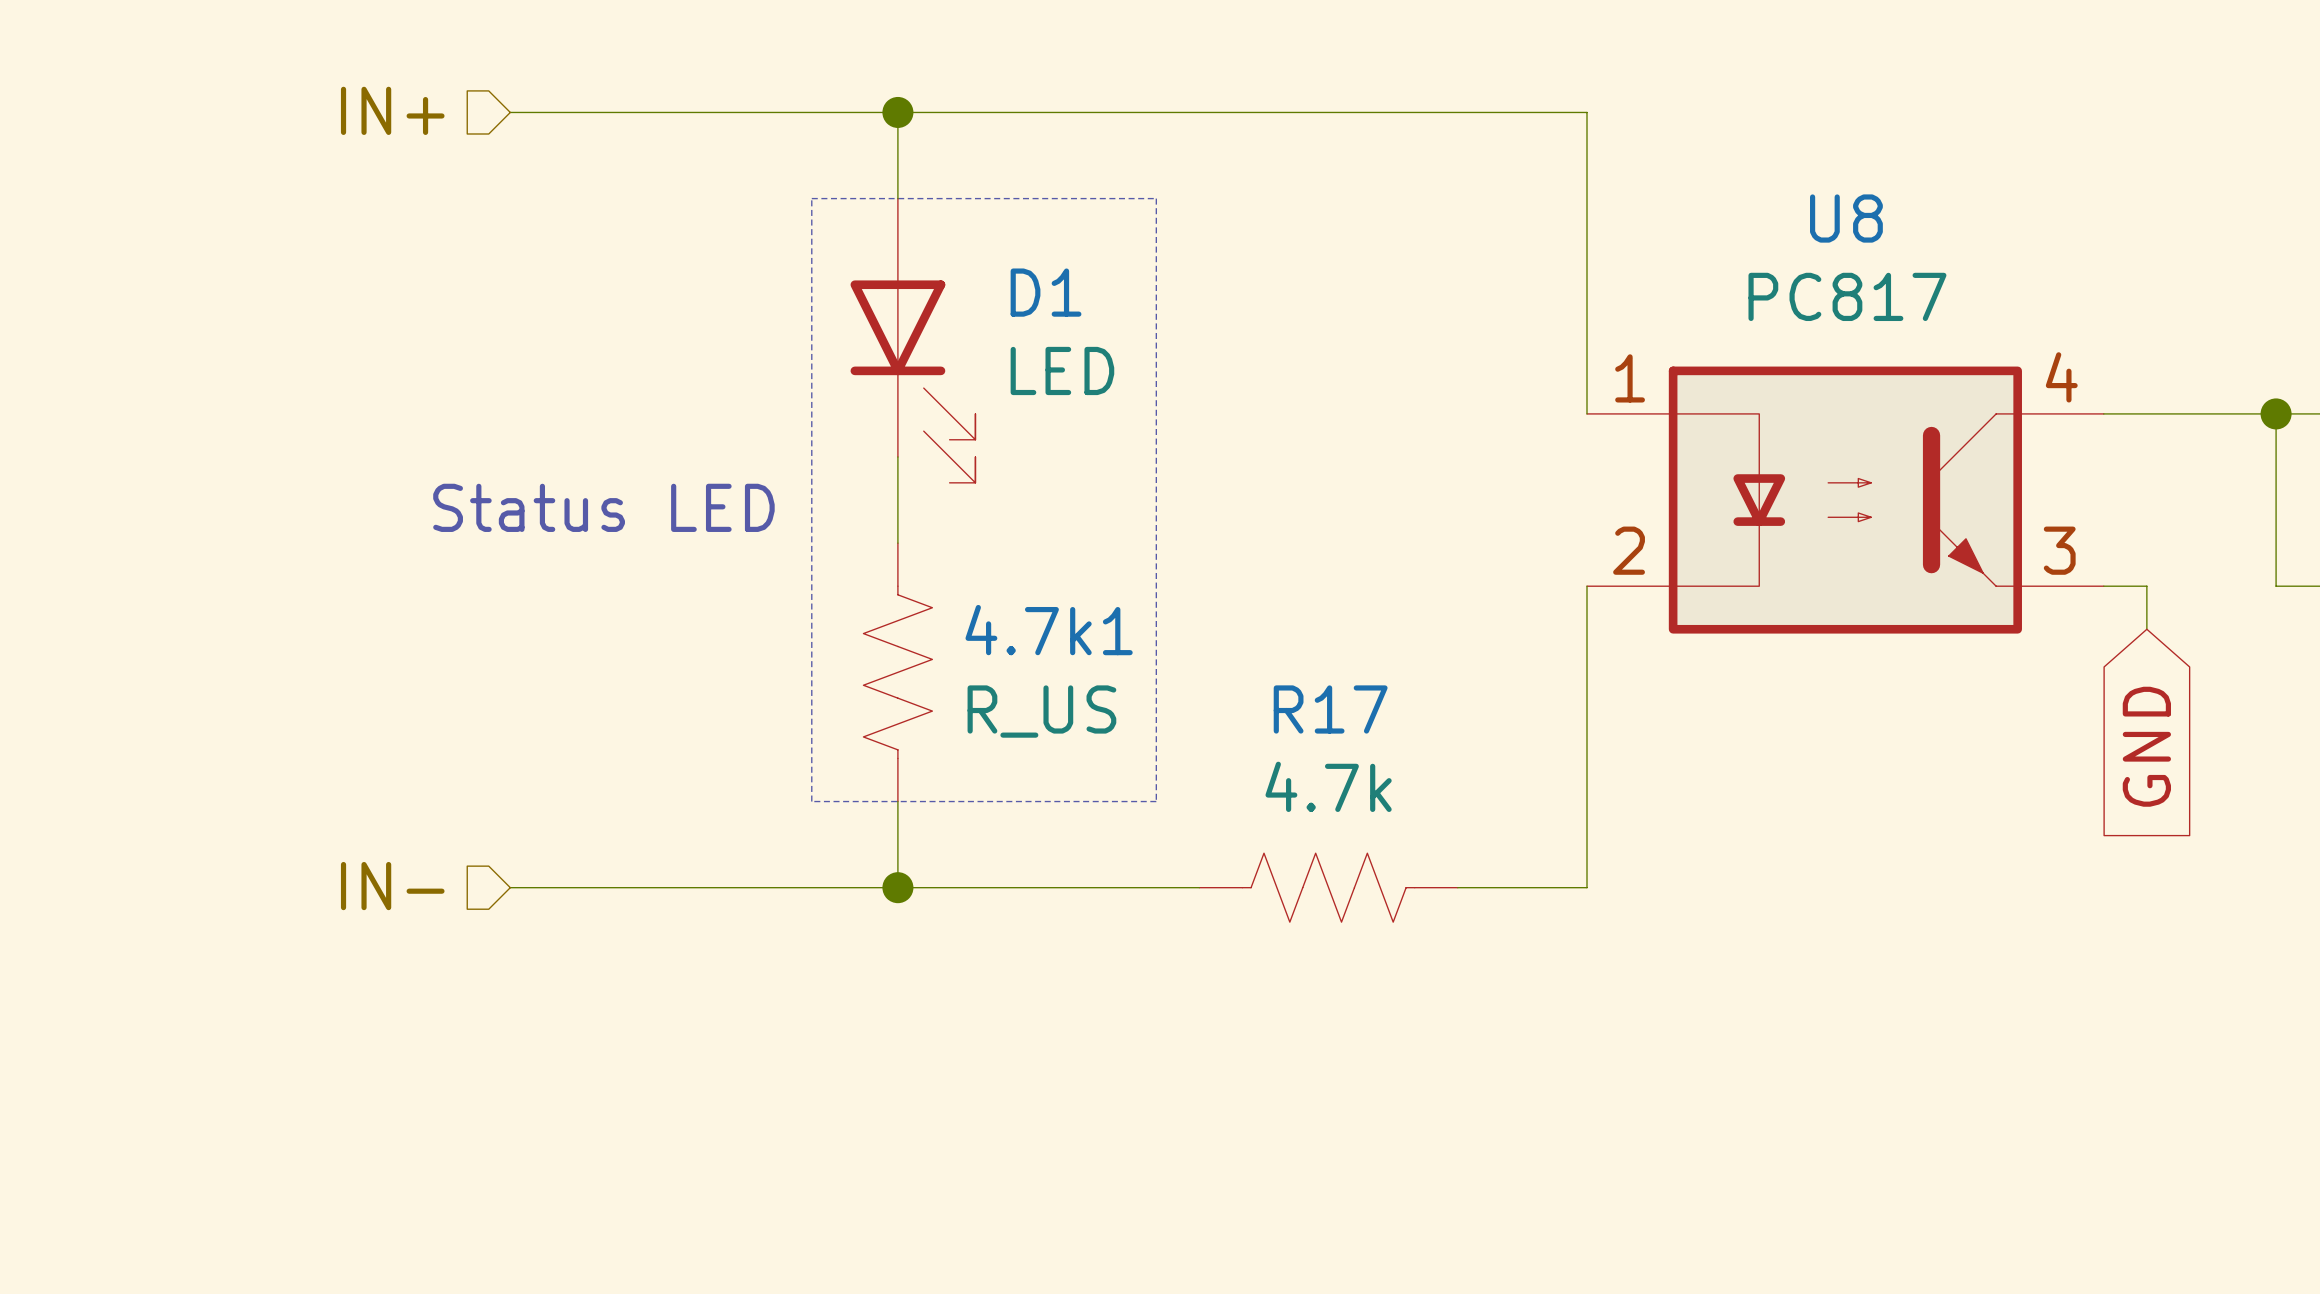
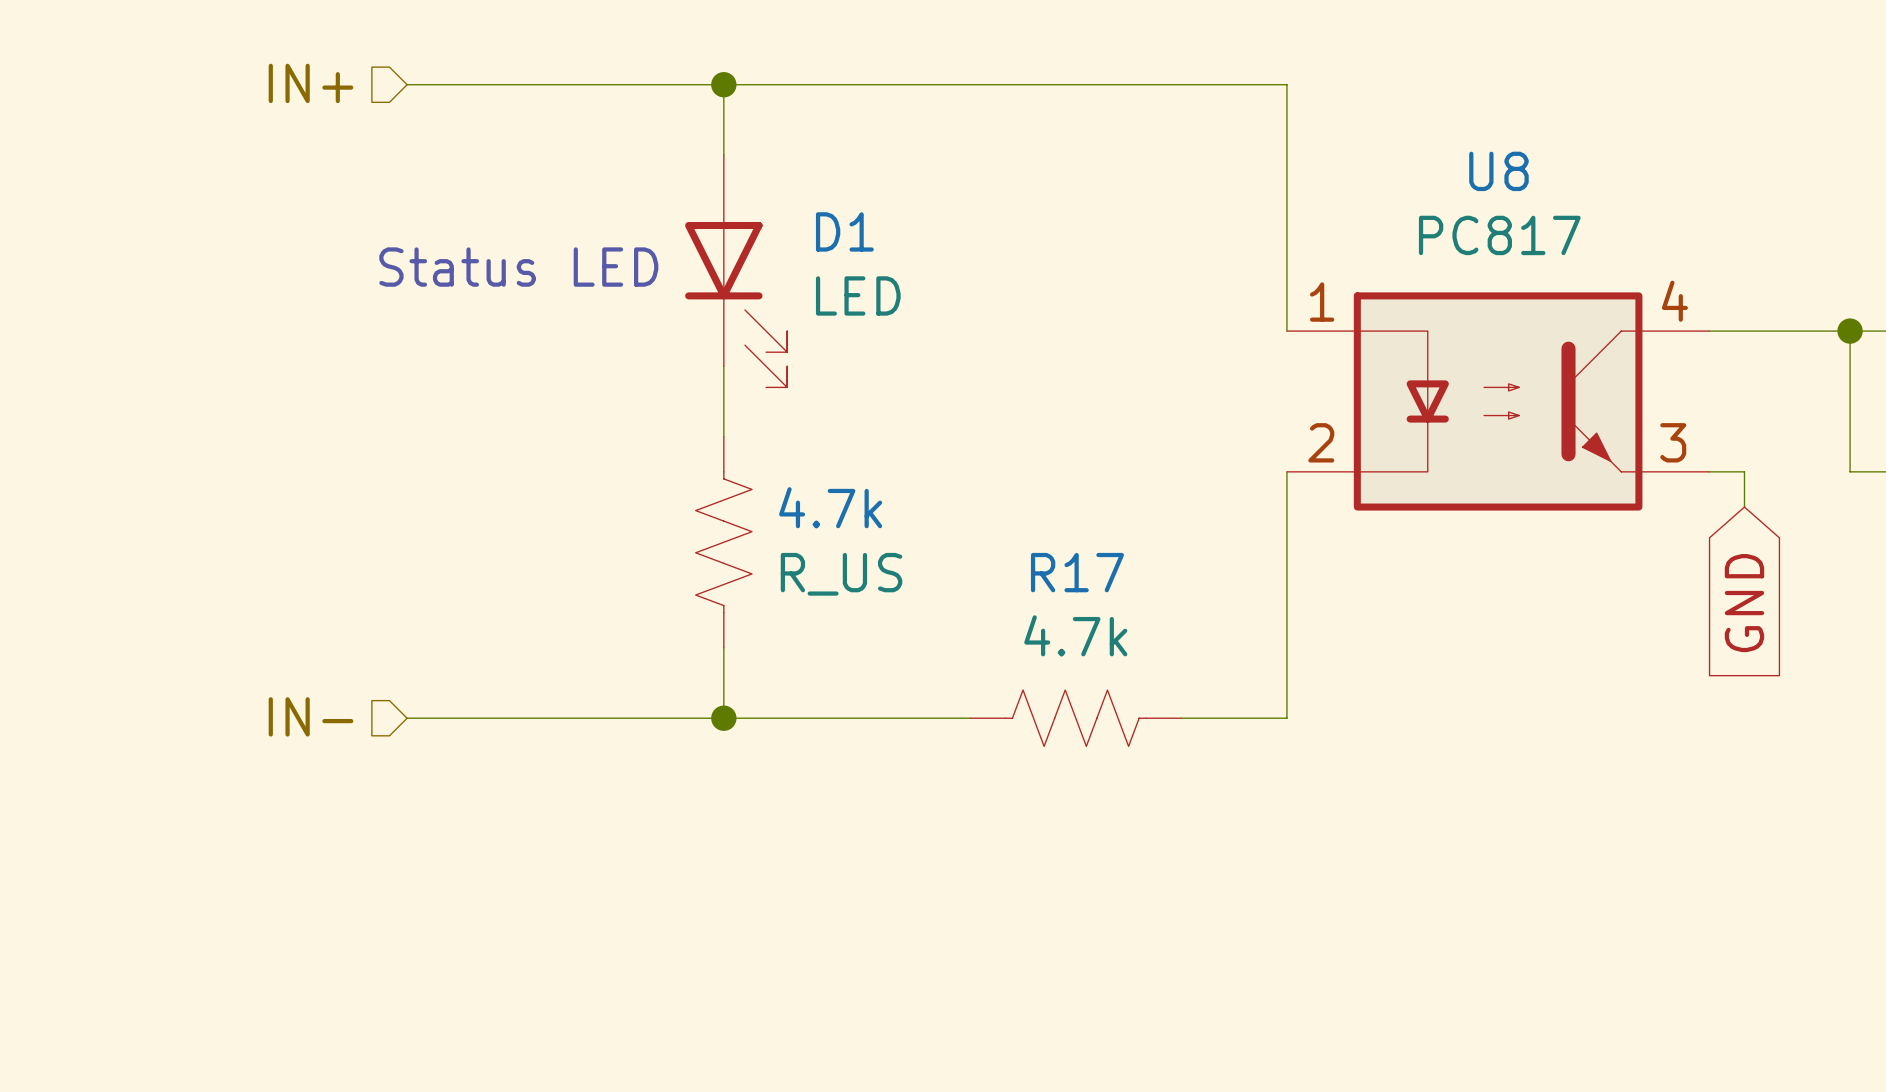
line: (811, 198) (1156, 198) (1156, 801) (811, 801) (811, 198) -> none
text position: Status LED (603, 507) -> Status LED (518, 267)
4.7k1 name: 4.7k1 (1049, 630) -> 4.7k (830, 507)

